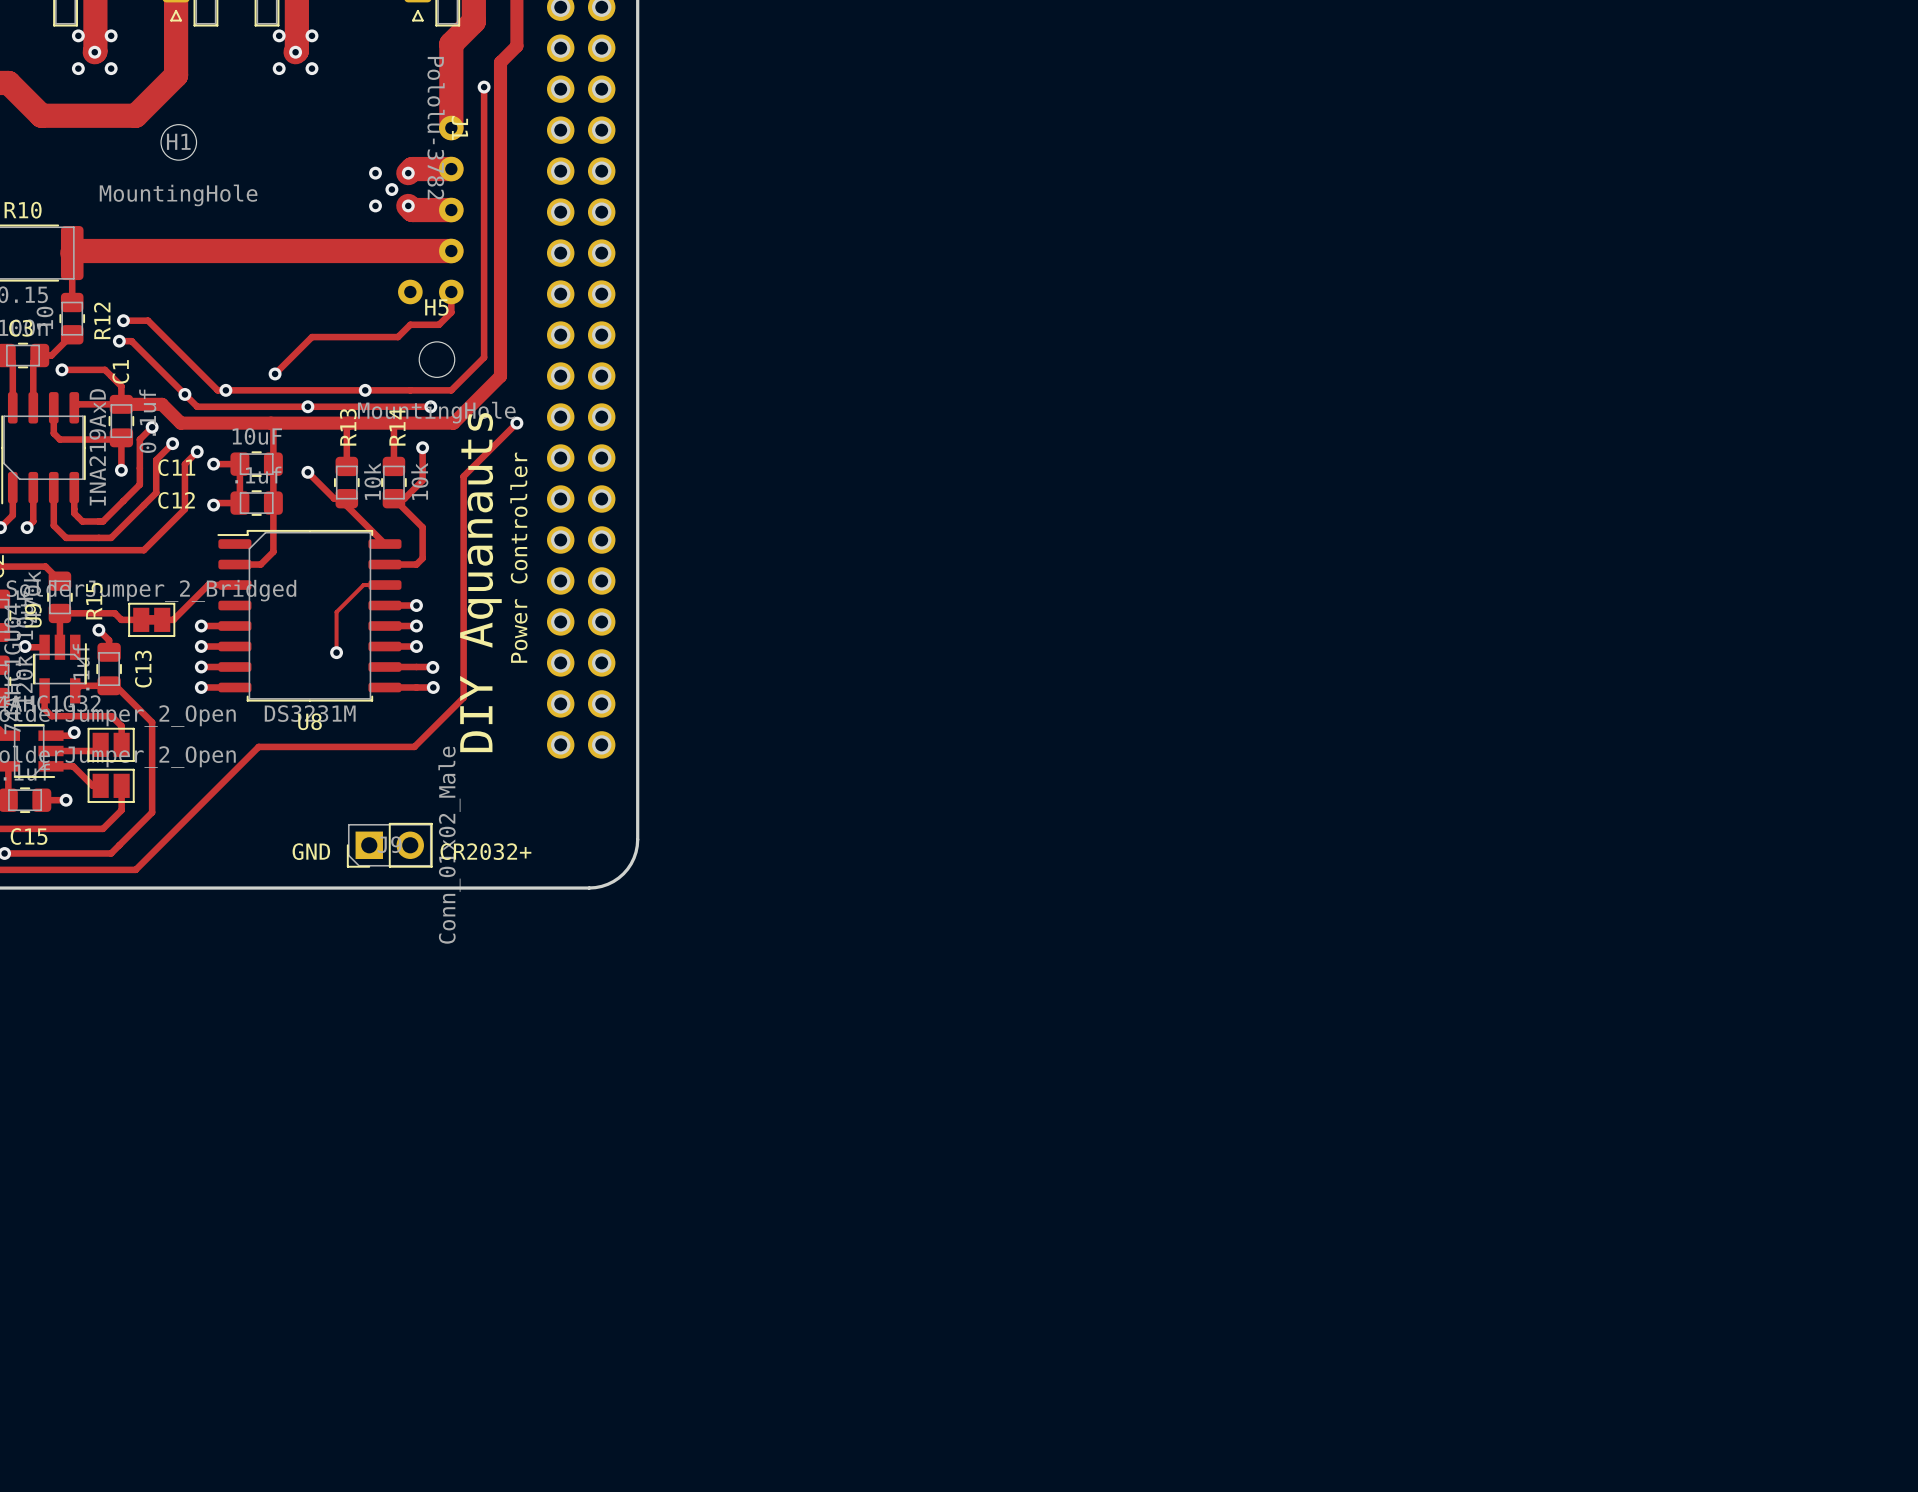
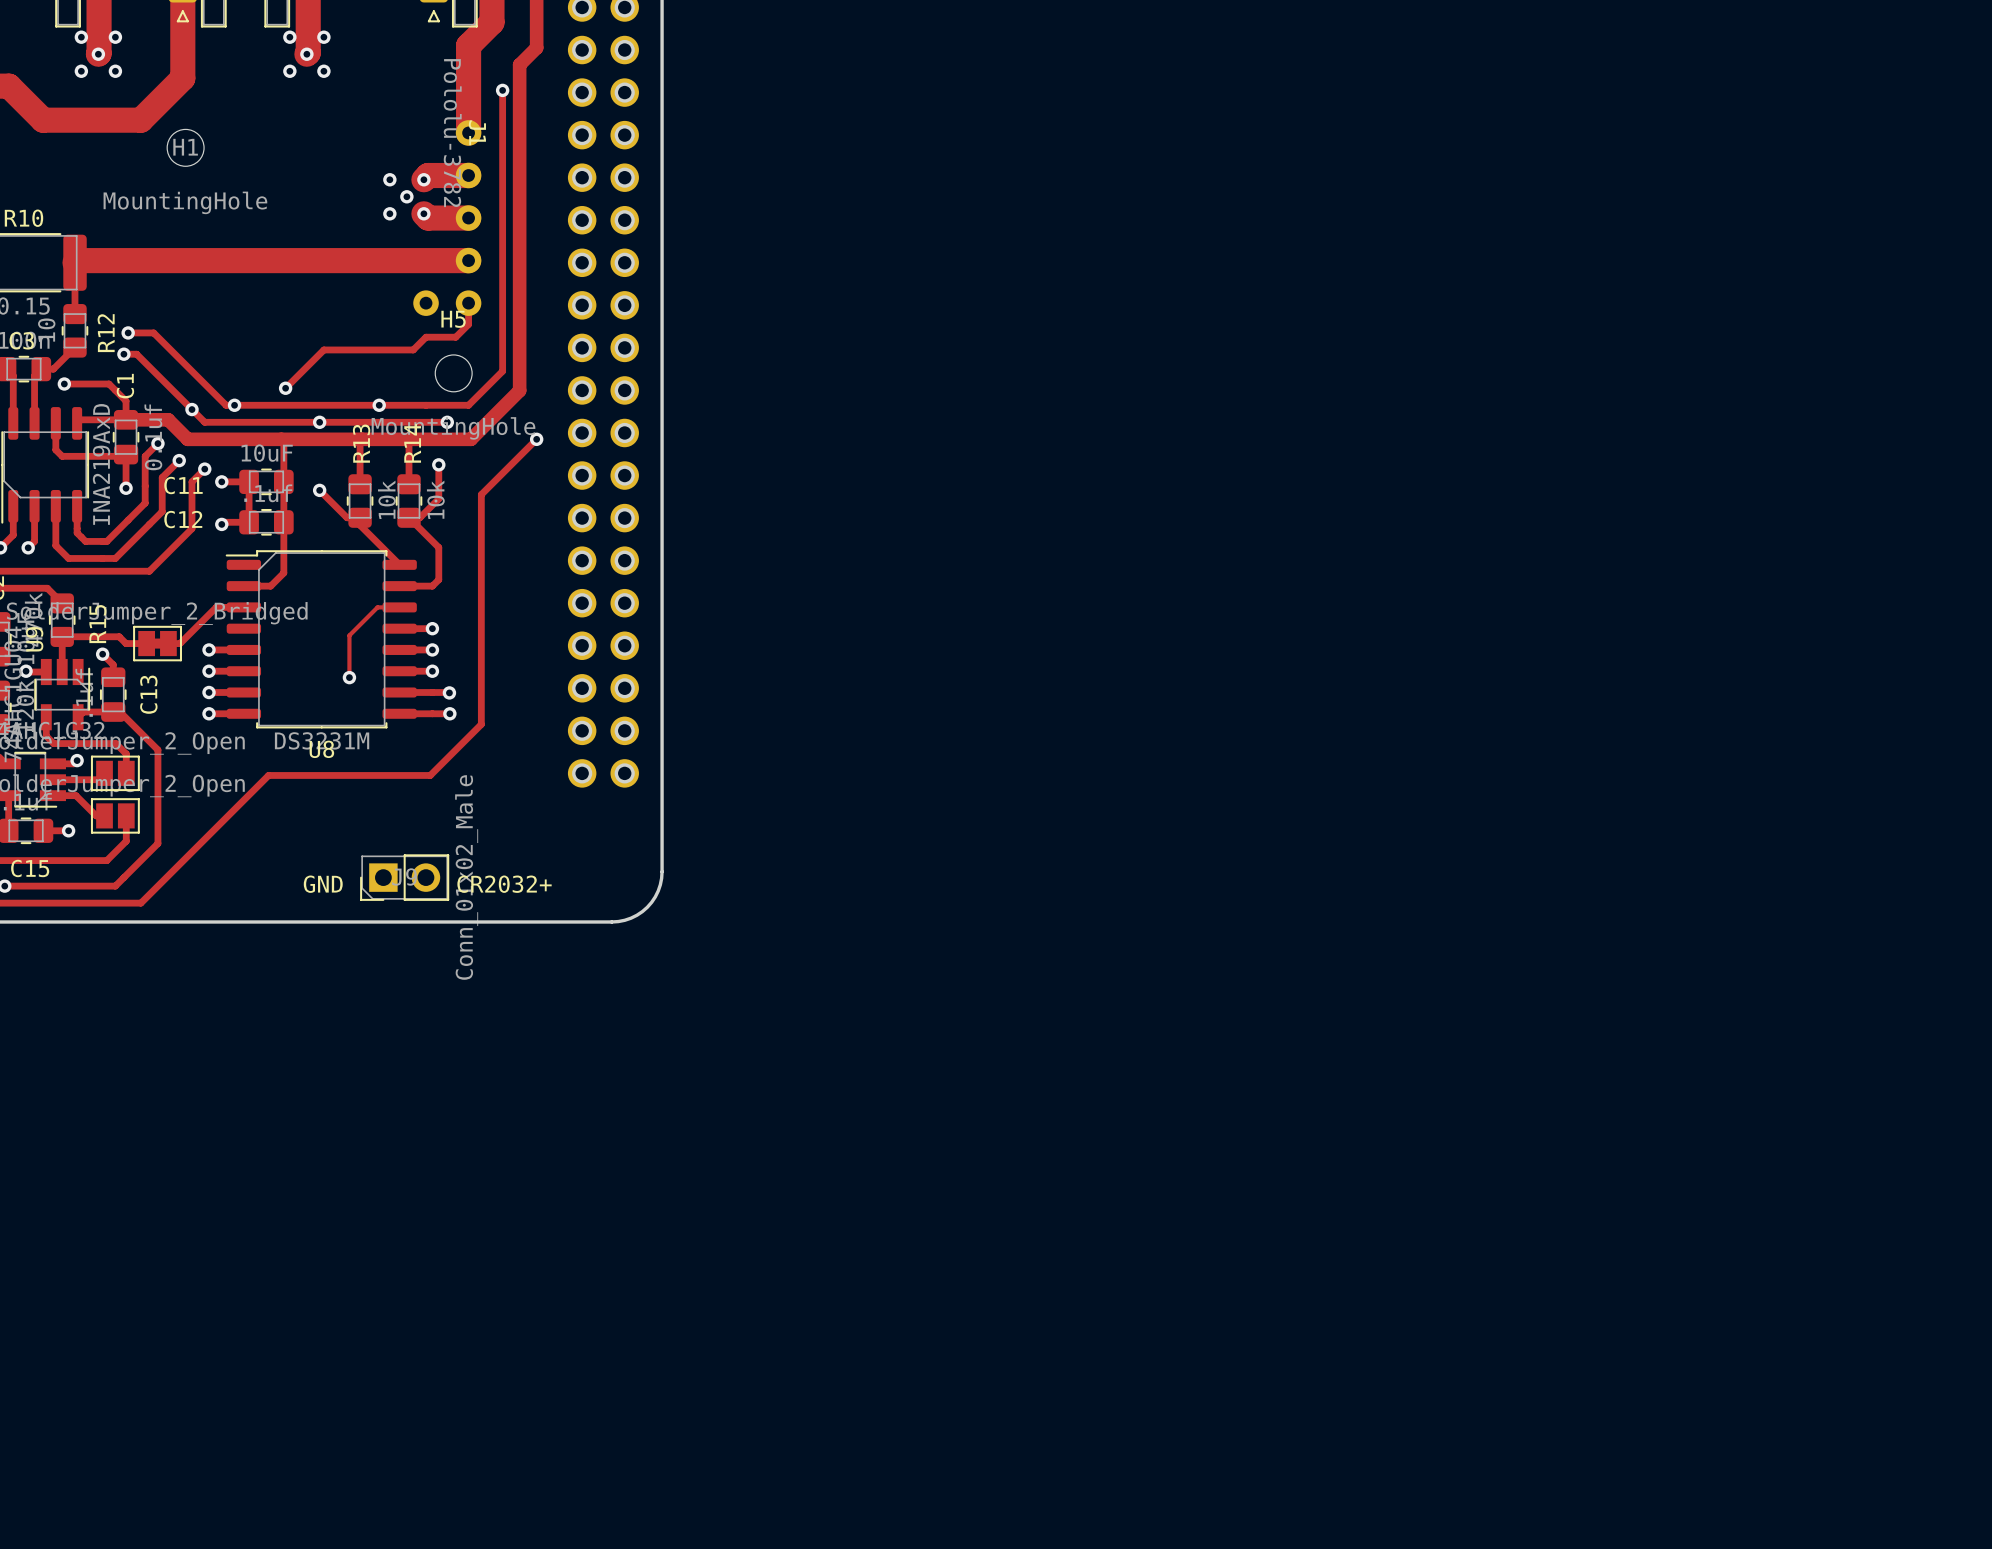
text: Power Controller (518, 557) -> none
text: DIY Aquanauts (480, 582) -> none

